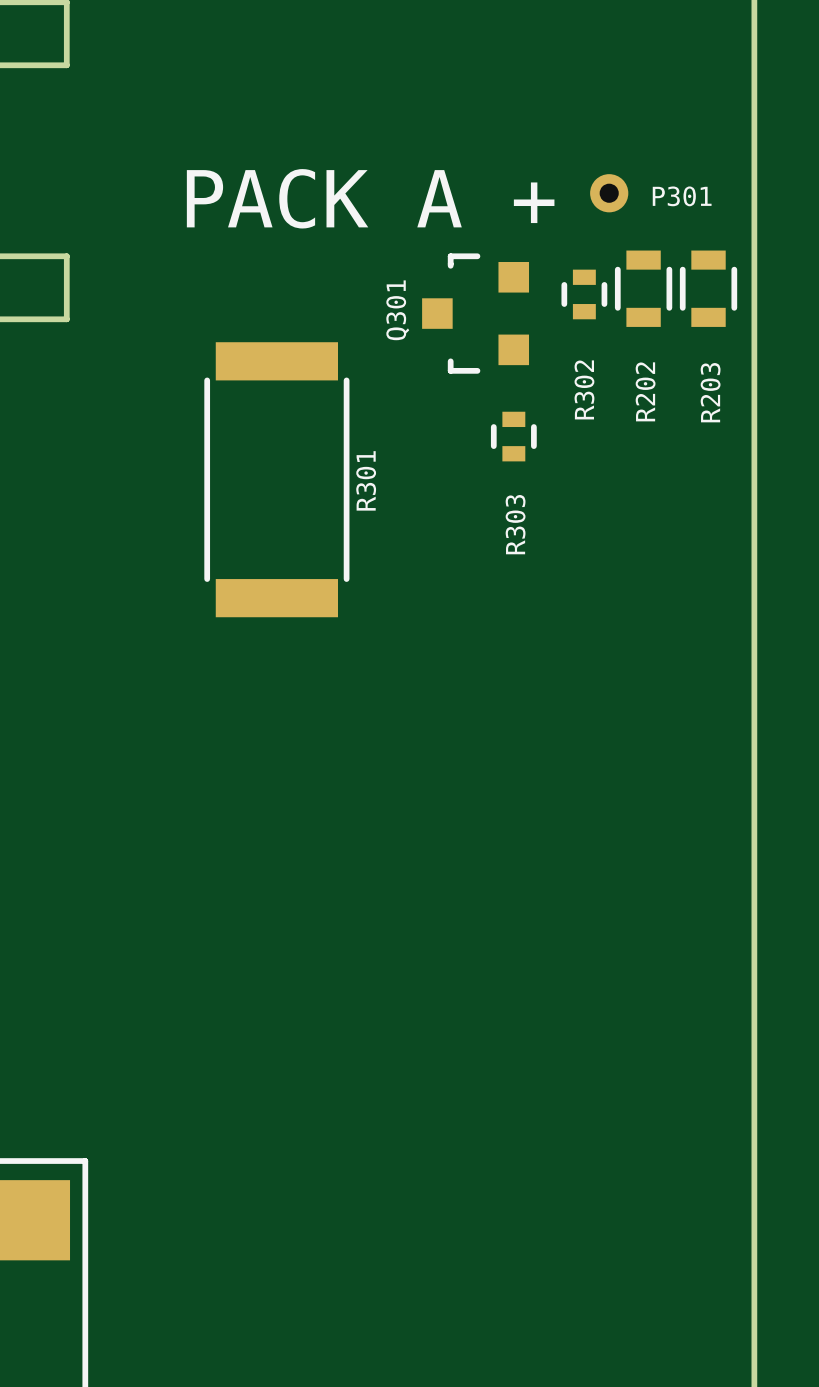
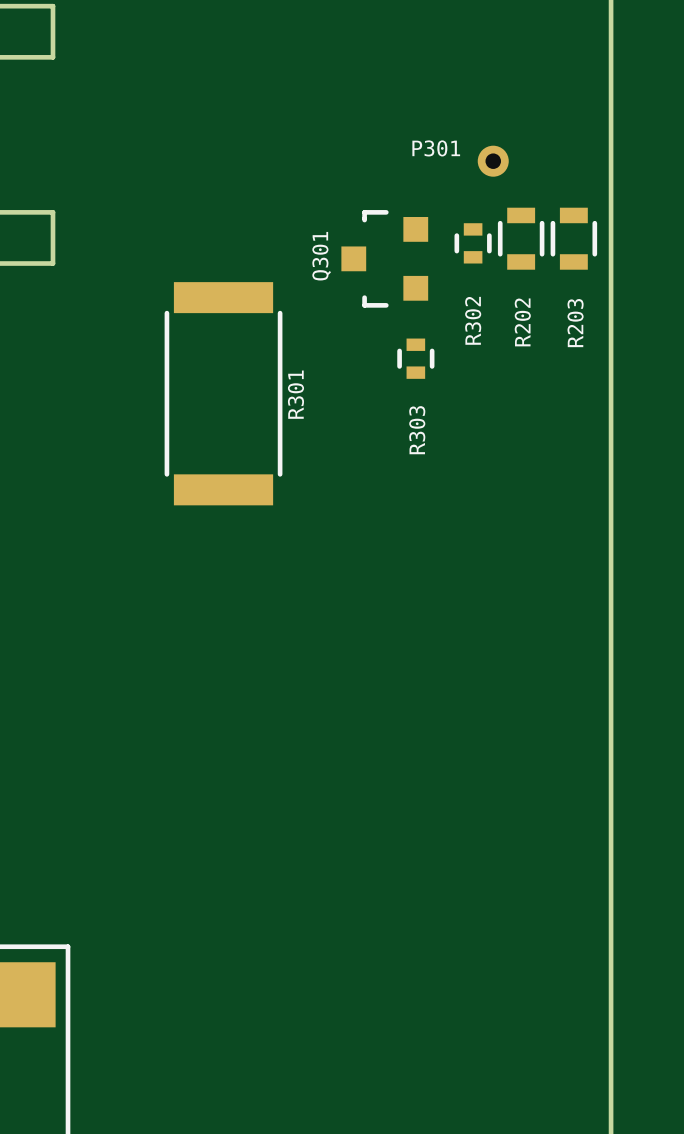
P301 name position: P301 (682, 196) -> P301 (436, 148)
text: PACK A + (370, 198) -> none

